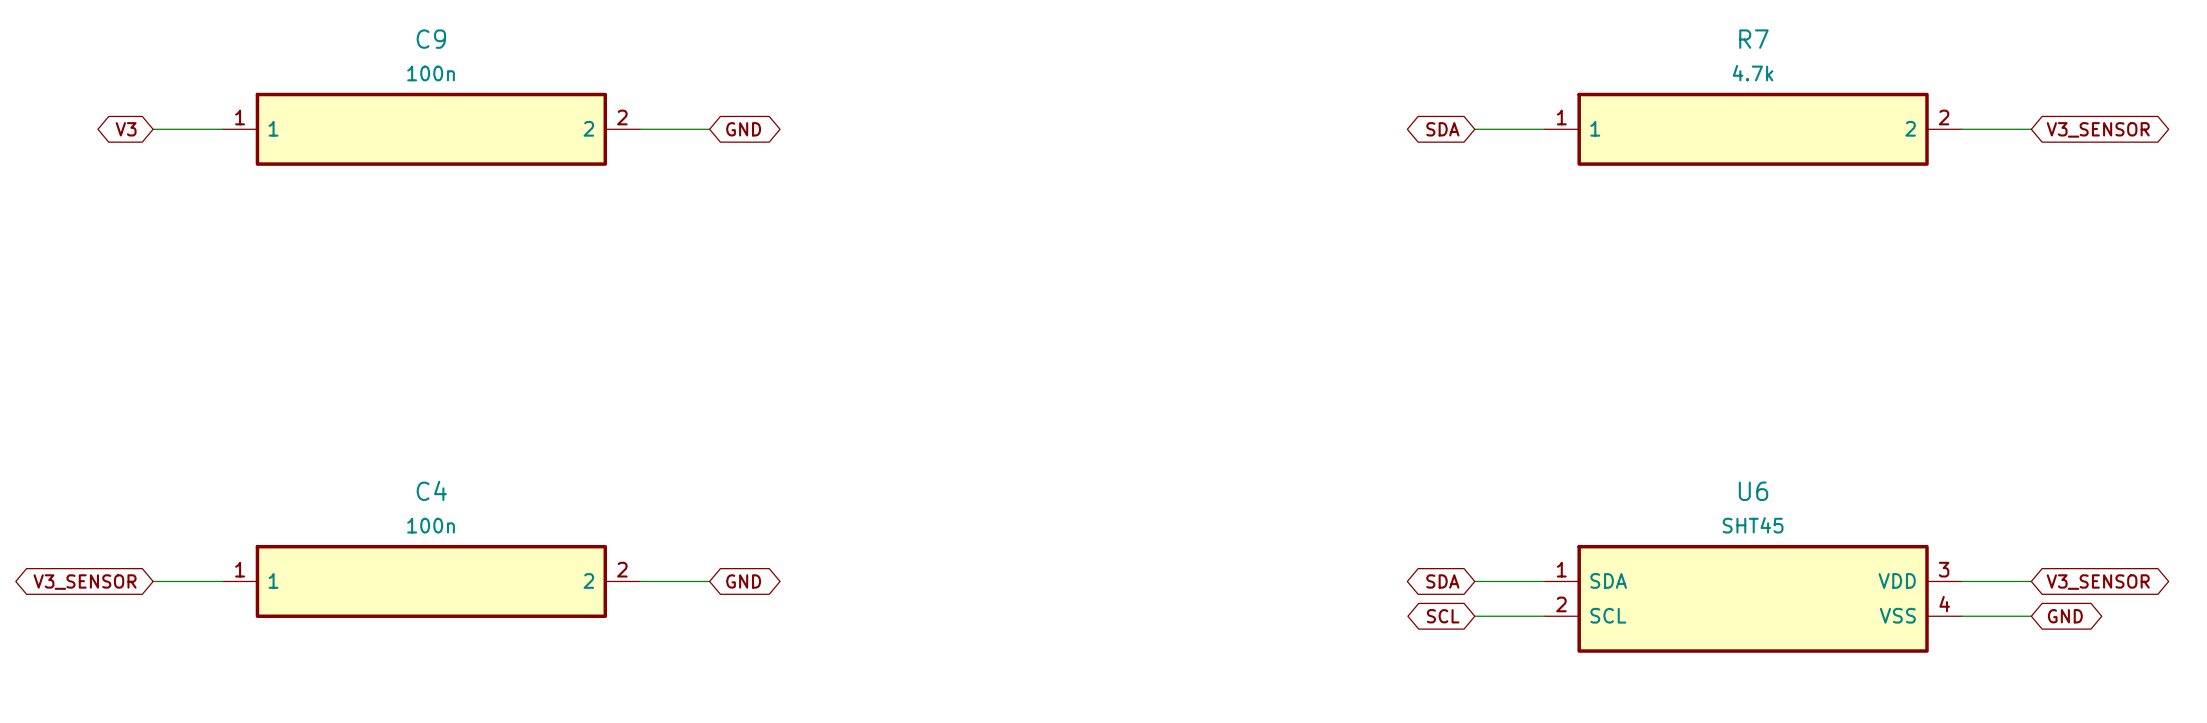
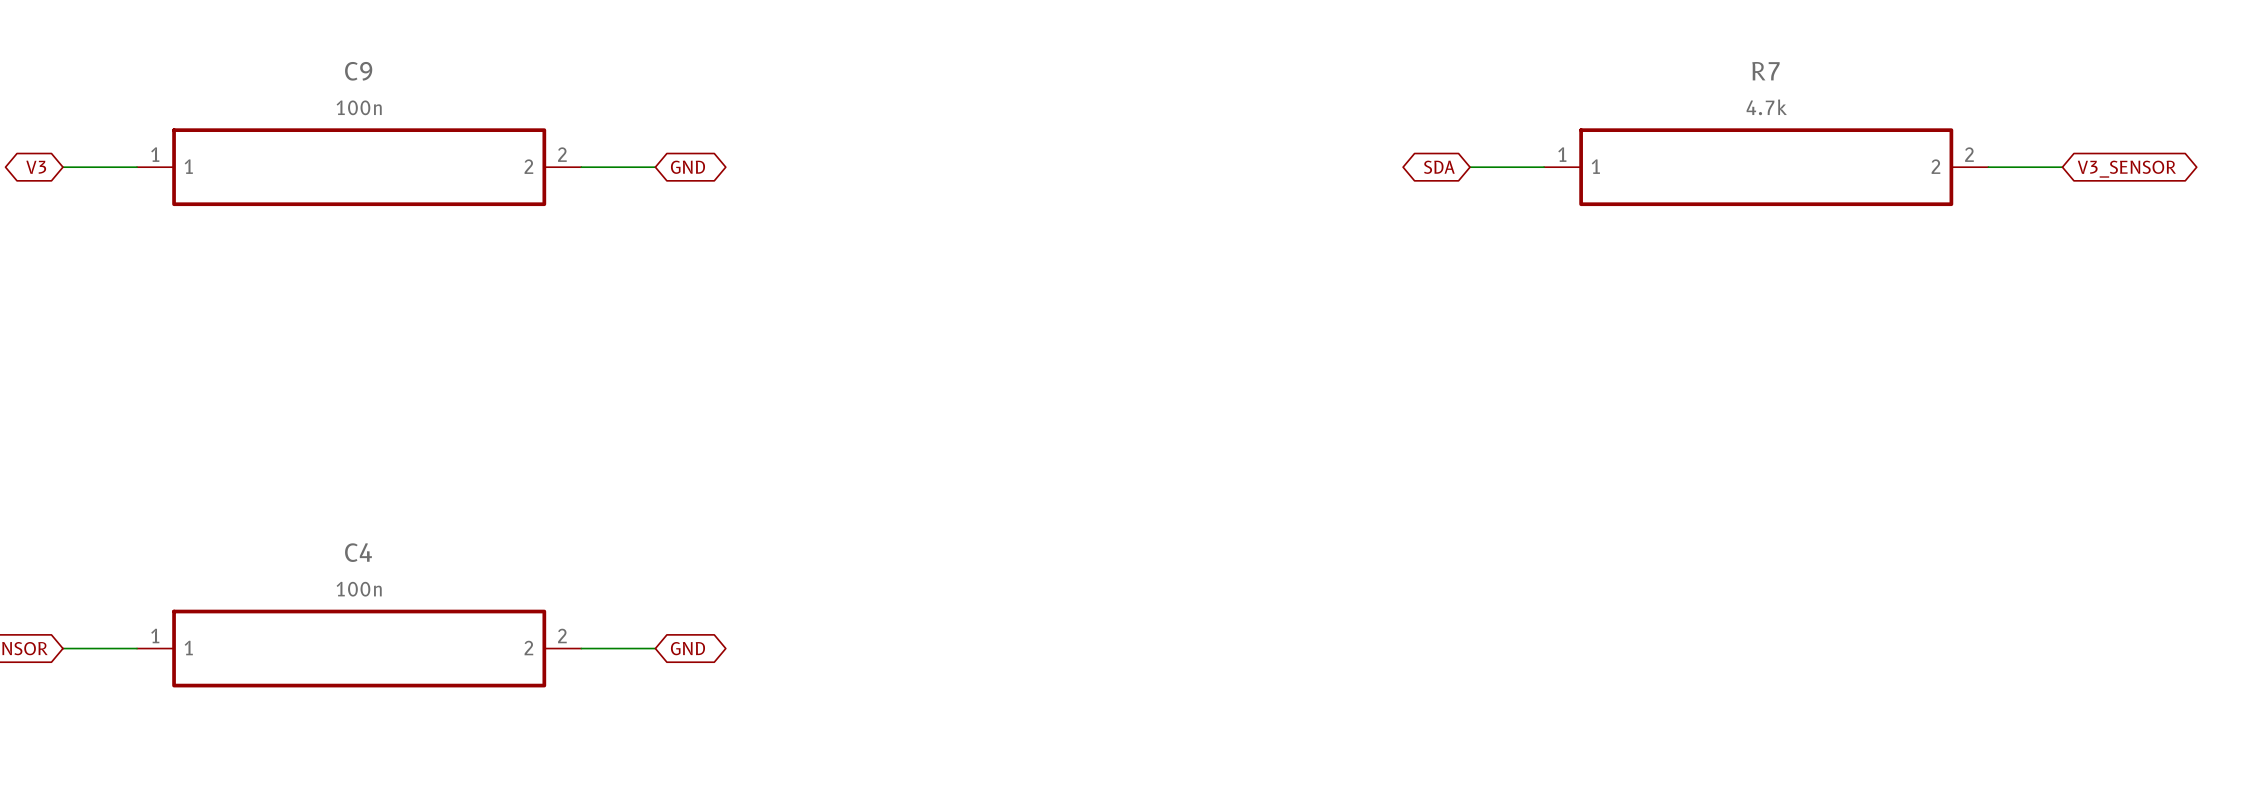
global label: SDA (1442, 581) -> none
wire: (1474, 581) (1544, 581) -> none
wire: (1961, 581) (2031, 581) -> none
global label: V3_SENSOR (2098, 582) -> none
U6: SHT45 (1753, 598) -> none
global label: SCL (1443, 616) -> none
wire: (1474, 616) (1544, 616) -> none
wire: (1961, 616) (2031, 616) -> none
global label: GND (2065, 616) -> none

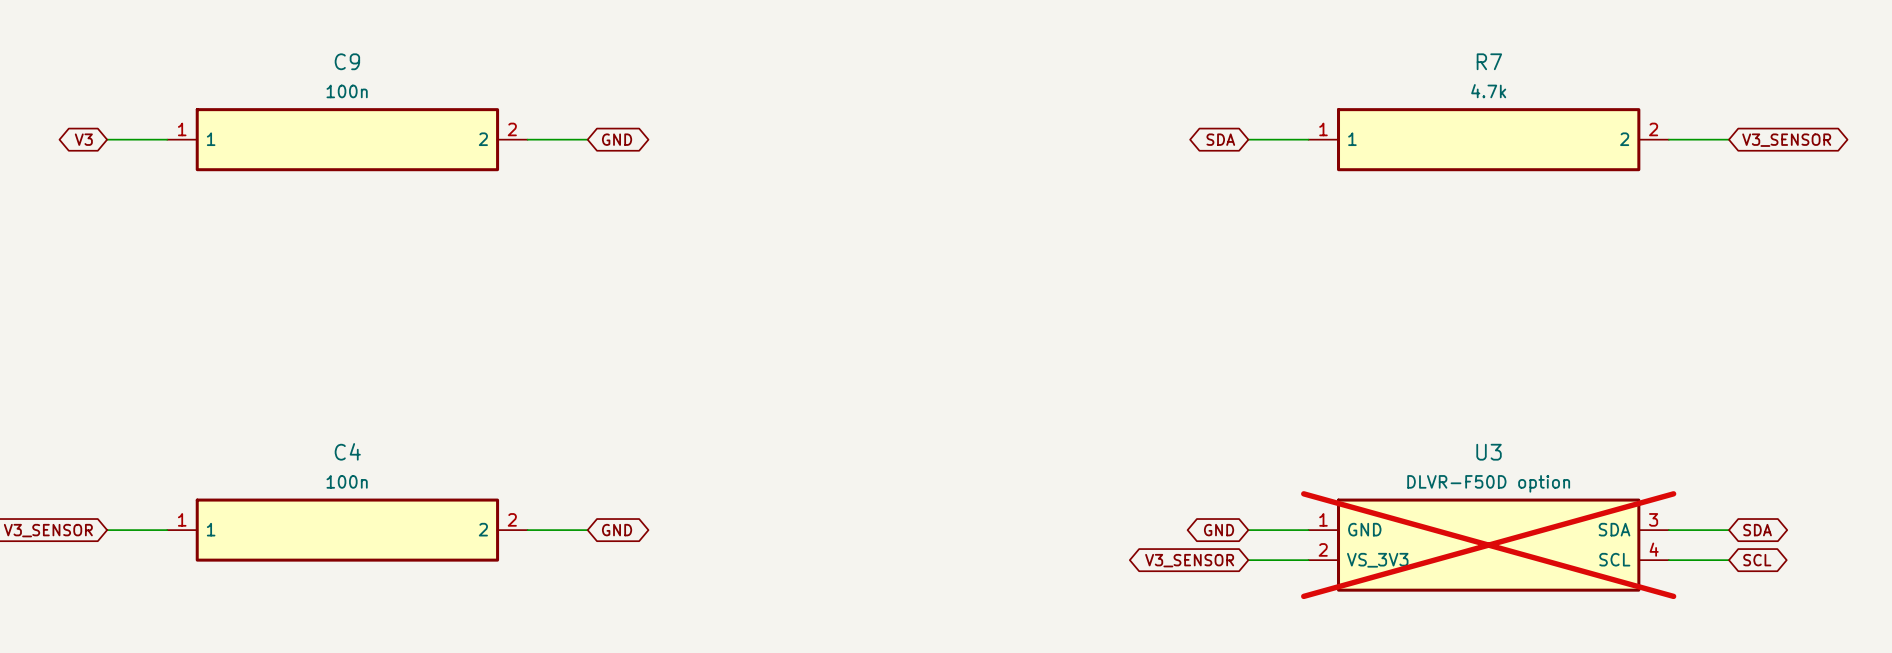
global label: none -> GND (1219, 530)
wire: none -> (1248, 530) (1308, 530)
wire: none -> (1668, 530) (1728, 530)
global label: none -> SDA (1757, 530)
U3: none -> DLVR-F50D option (1488, 545)
wire: none -> (1248, 560) (1308, 560)
wire: none -> (1668, 560) (1728, 560)
global label: none -> SCL (1757, 560)
global label: none -> V3_SENSOR (1189, 560)

